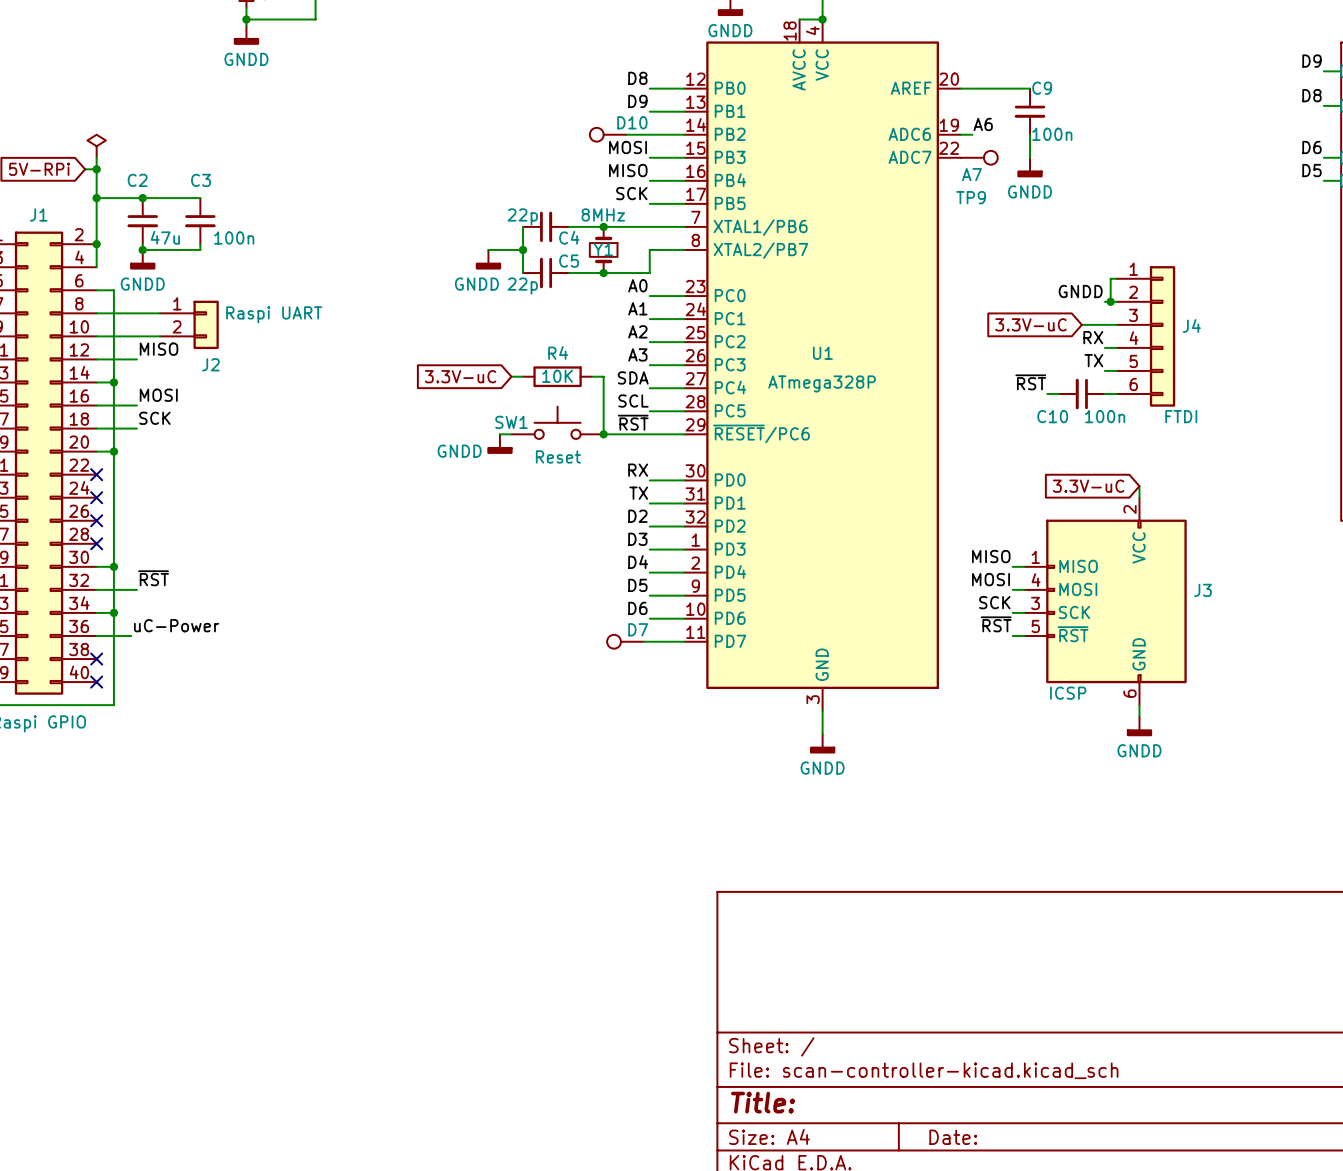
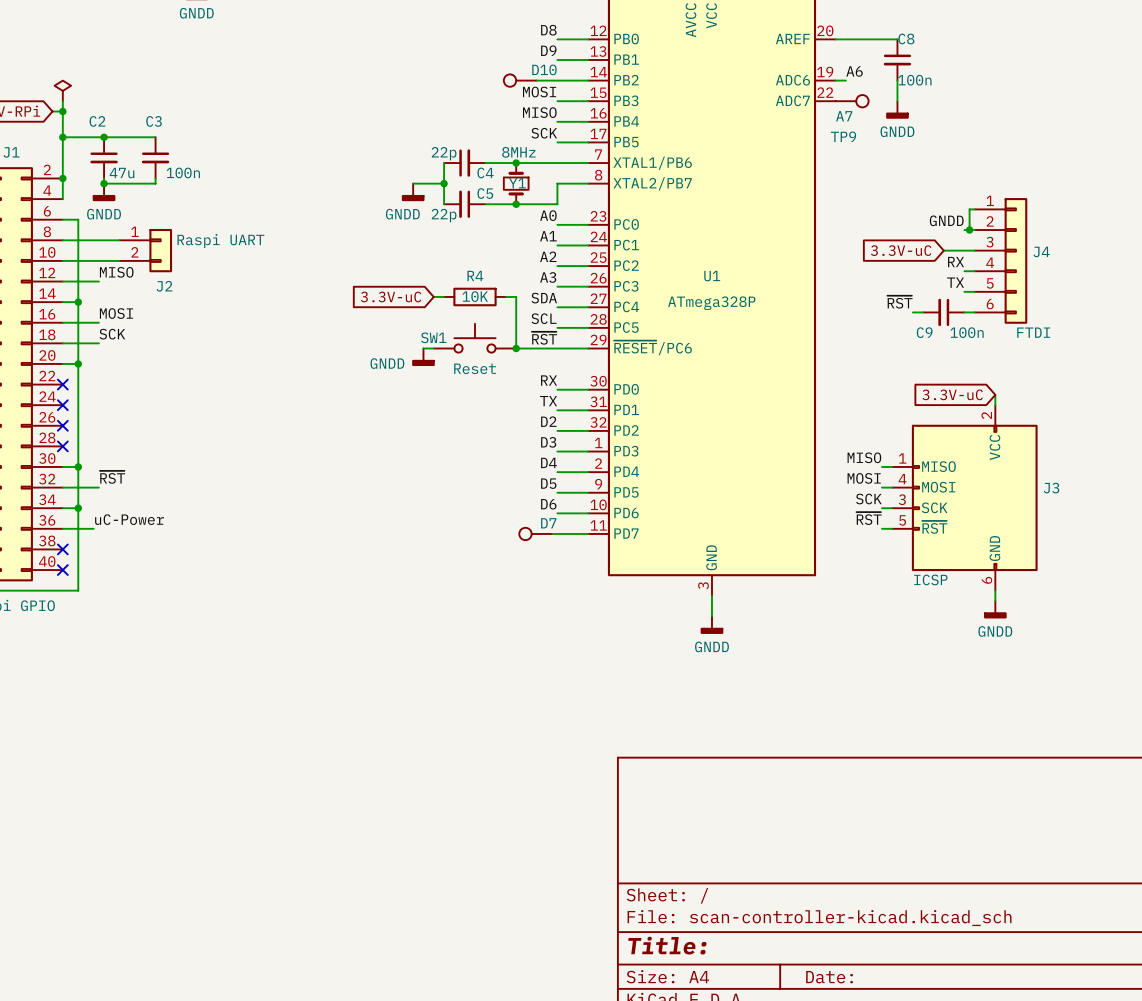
C9 name: C9 (1042, 88) -> C8 (906, 39)
C10 name: C10 (1052, 416) -> C9 (924, 332)

